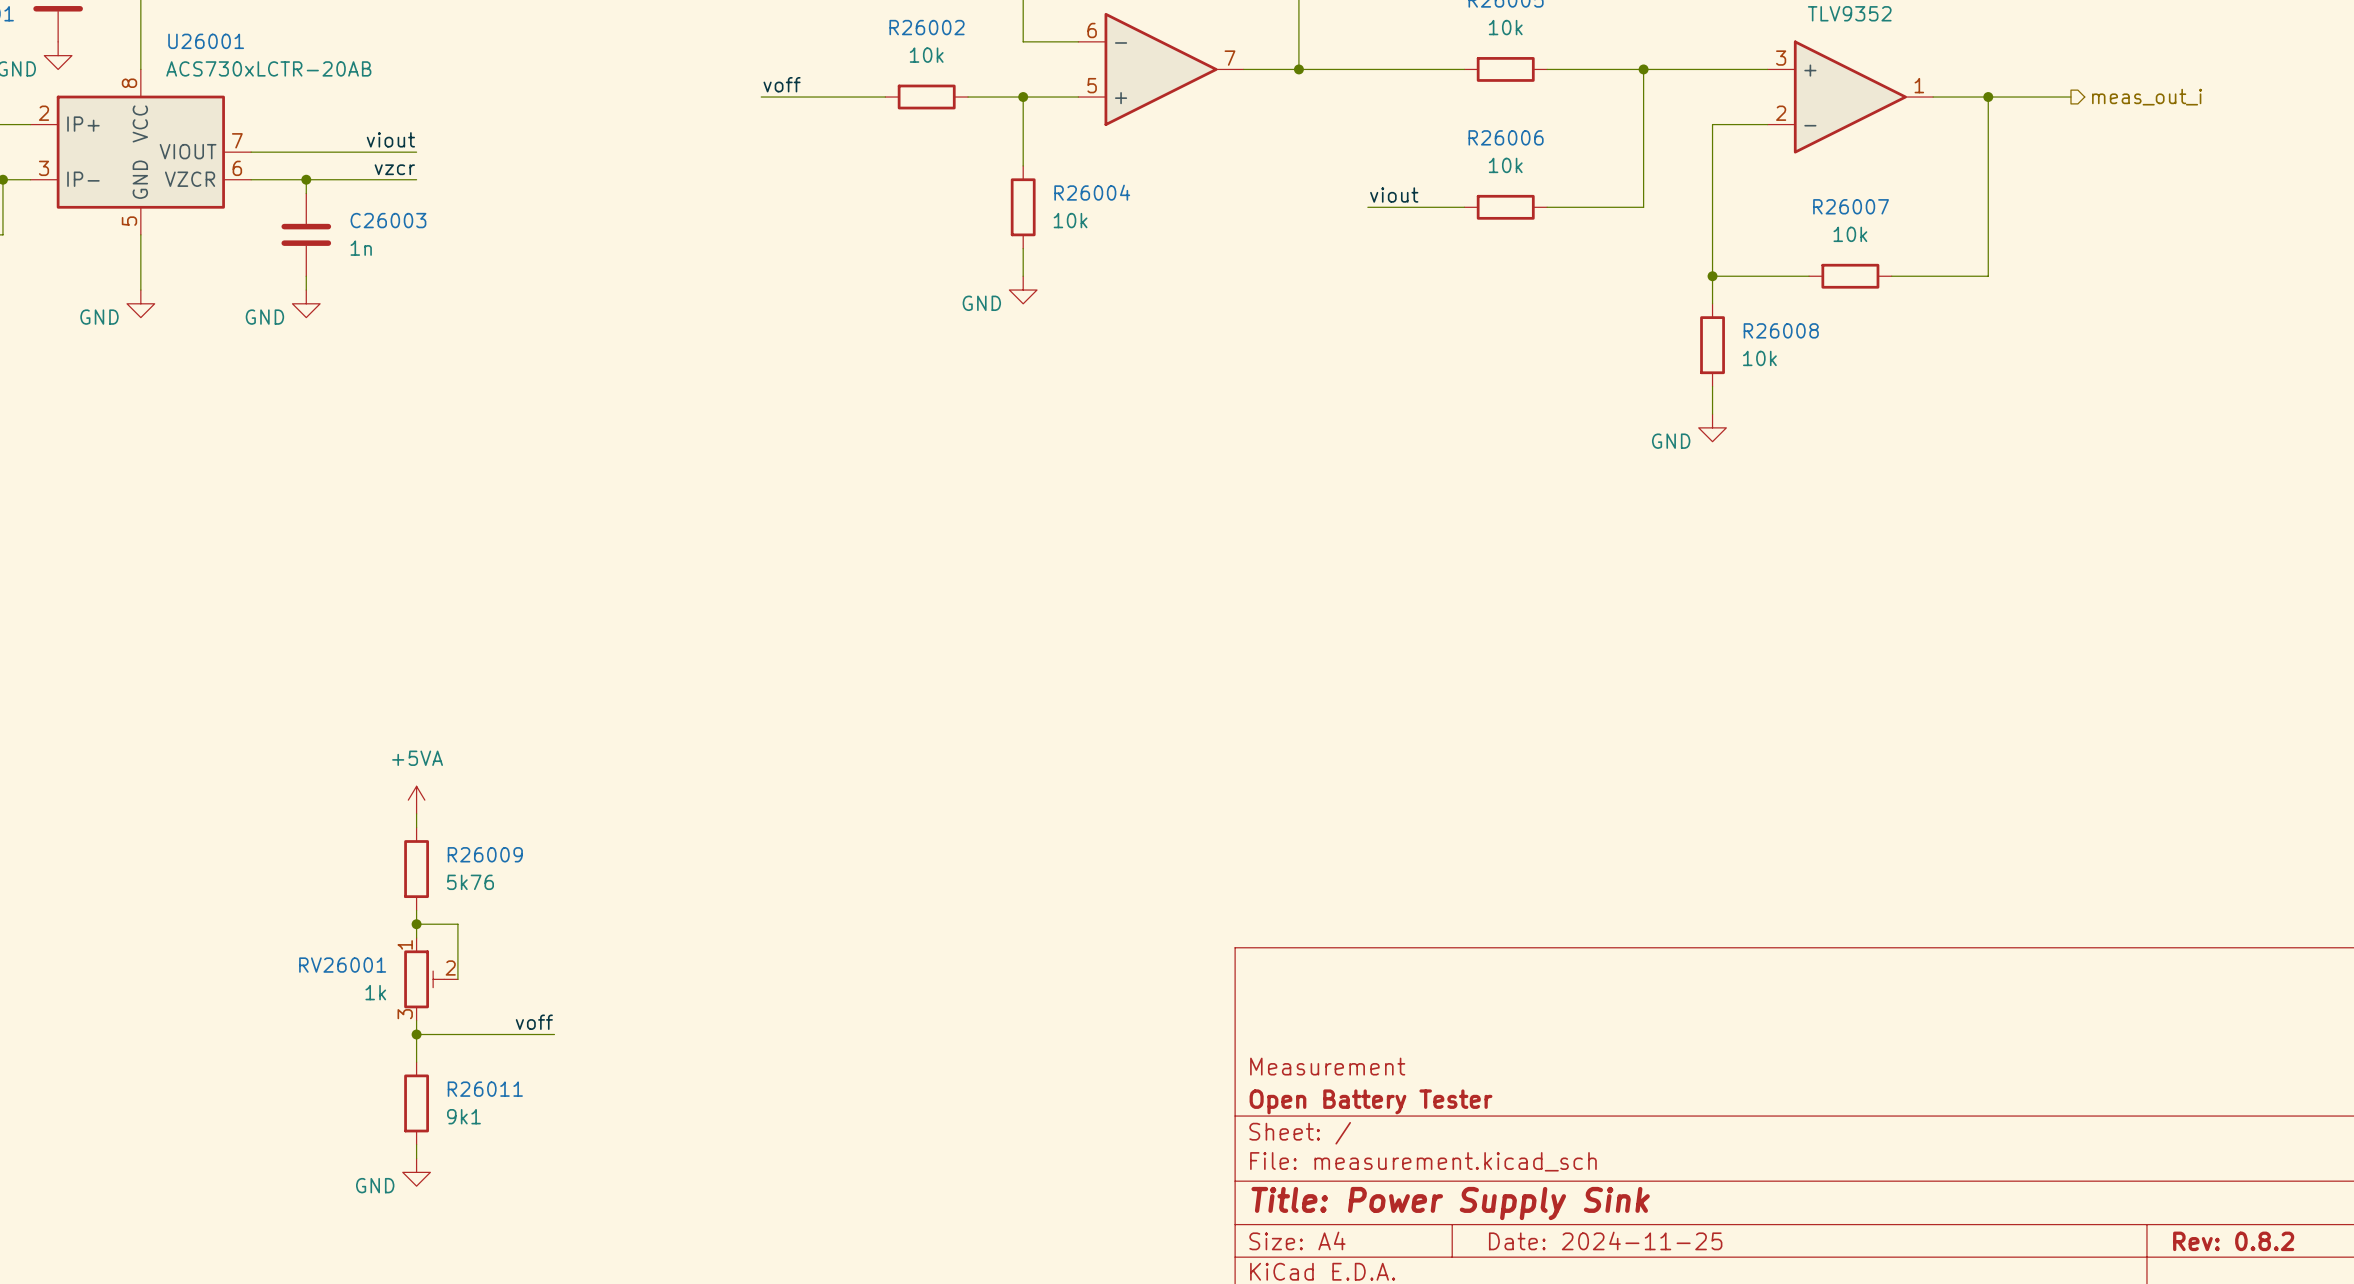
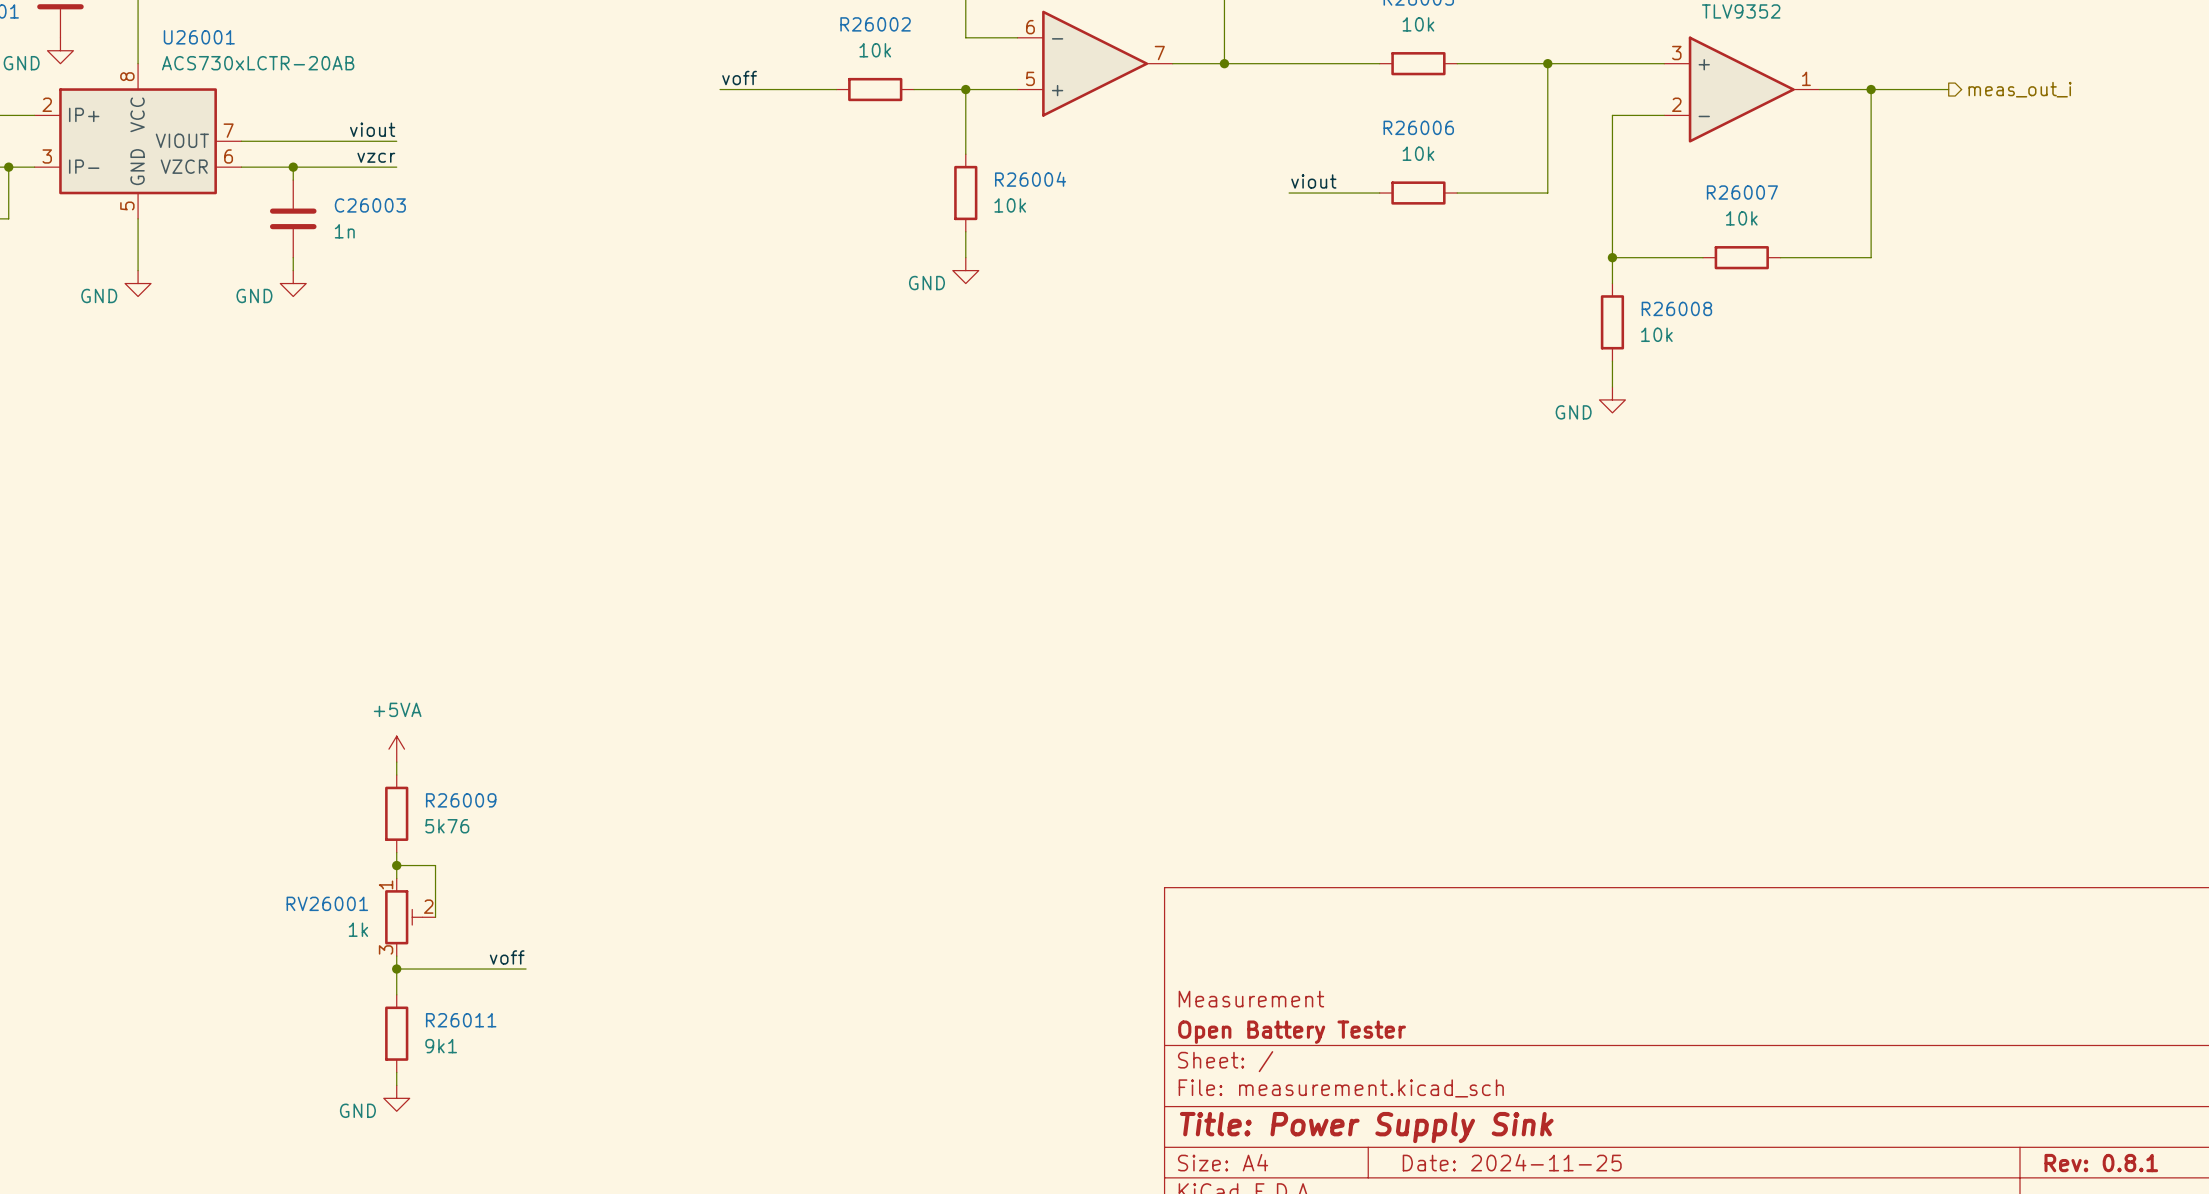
title block: Rev: 0.8.2 (2233, 1241) -> Rev: 0.8.1 (2101, 1163)

